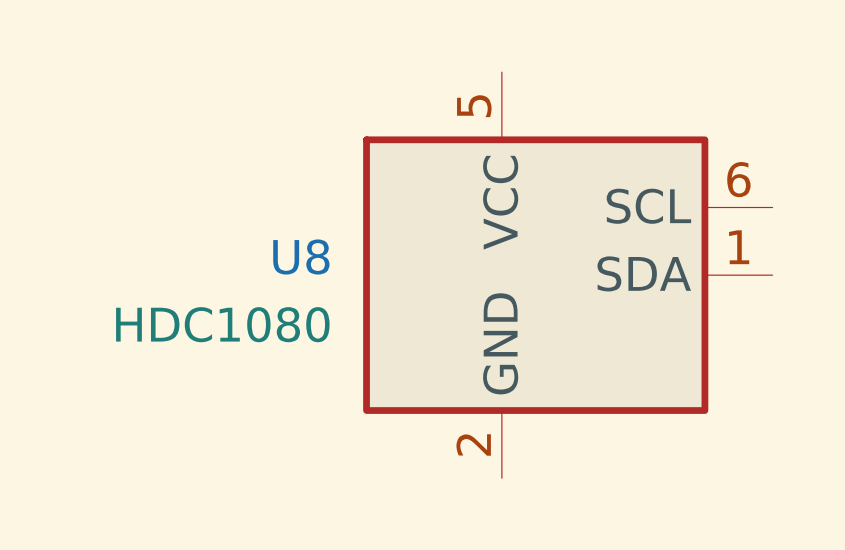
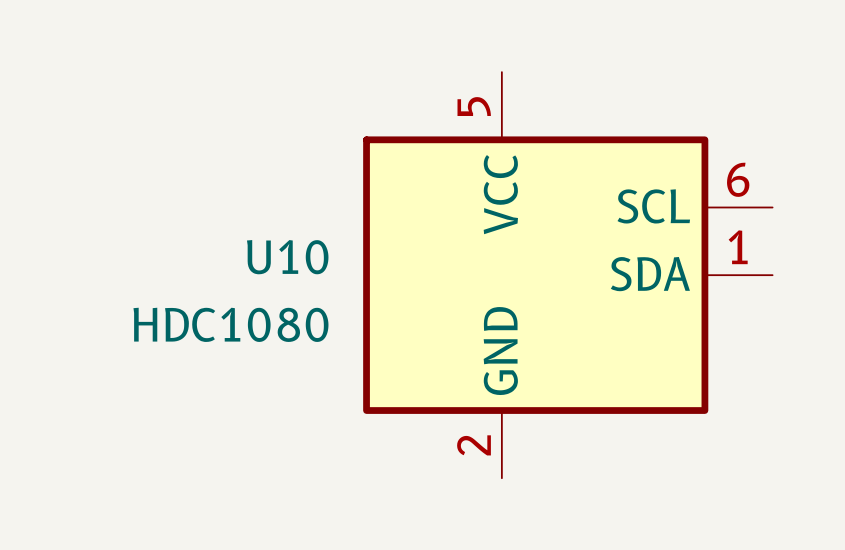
U8 name: U8 (301, 257) -> U10 (287, 257)

